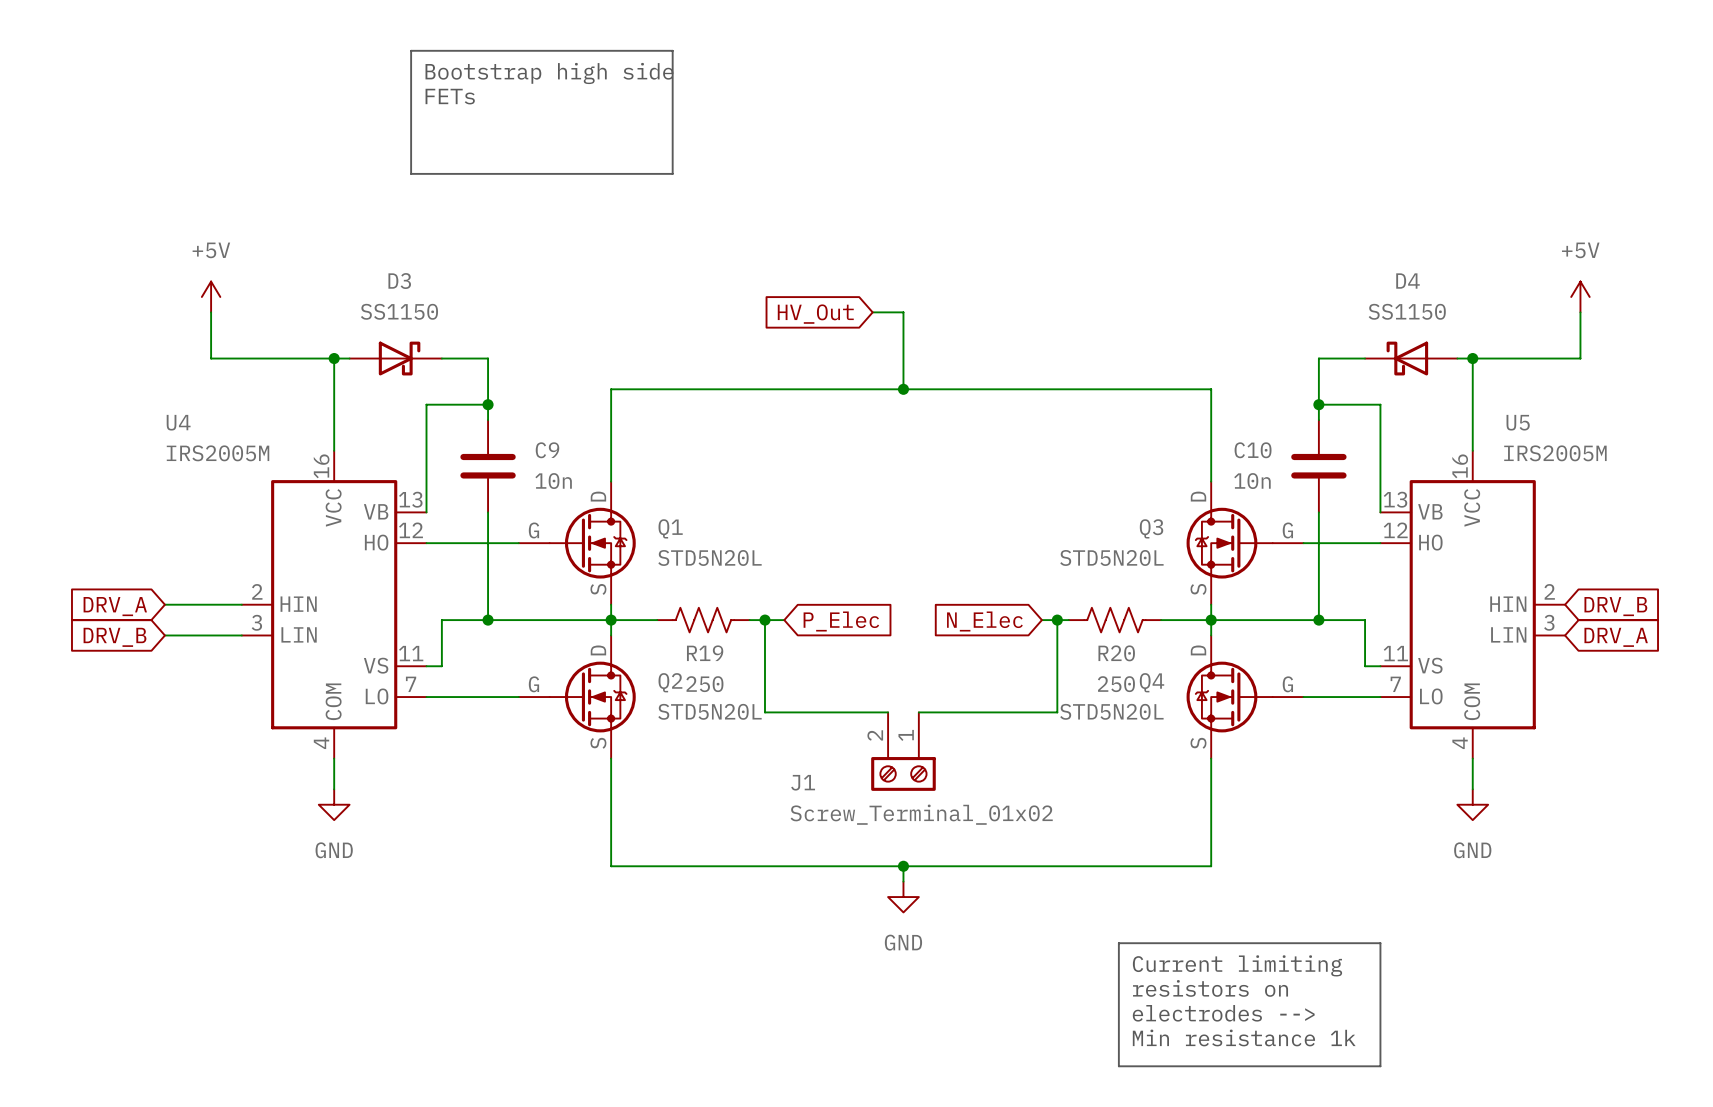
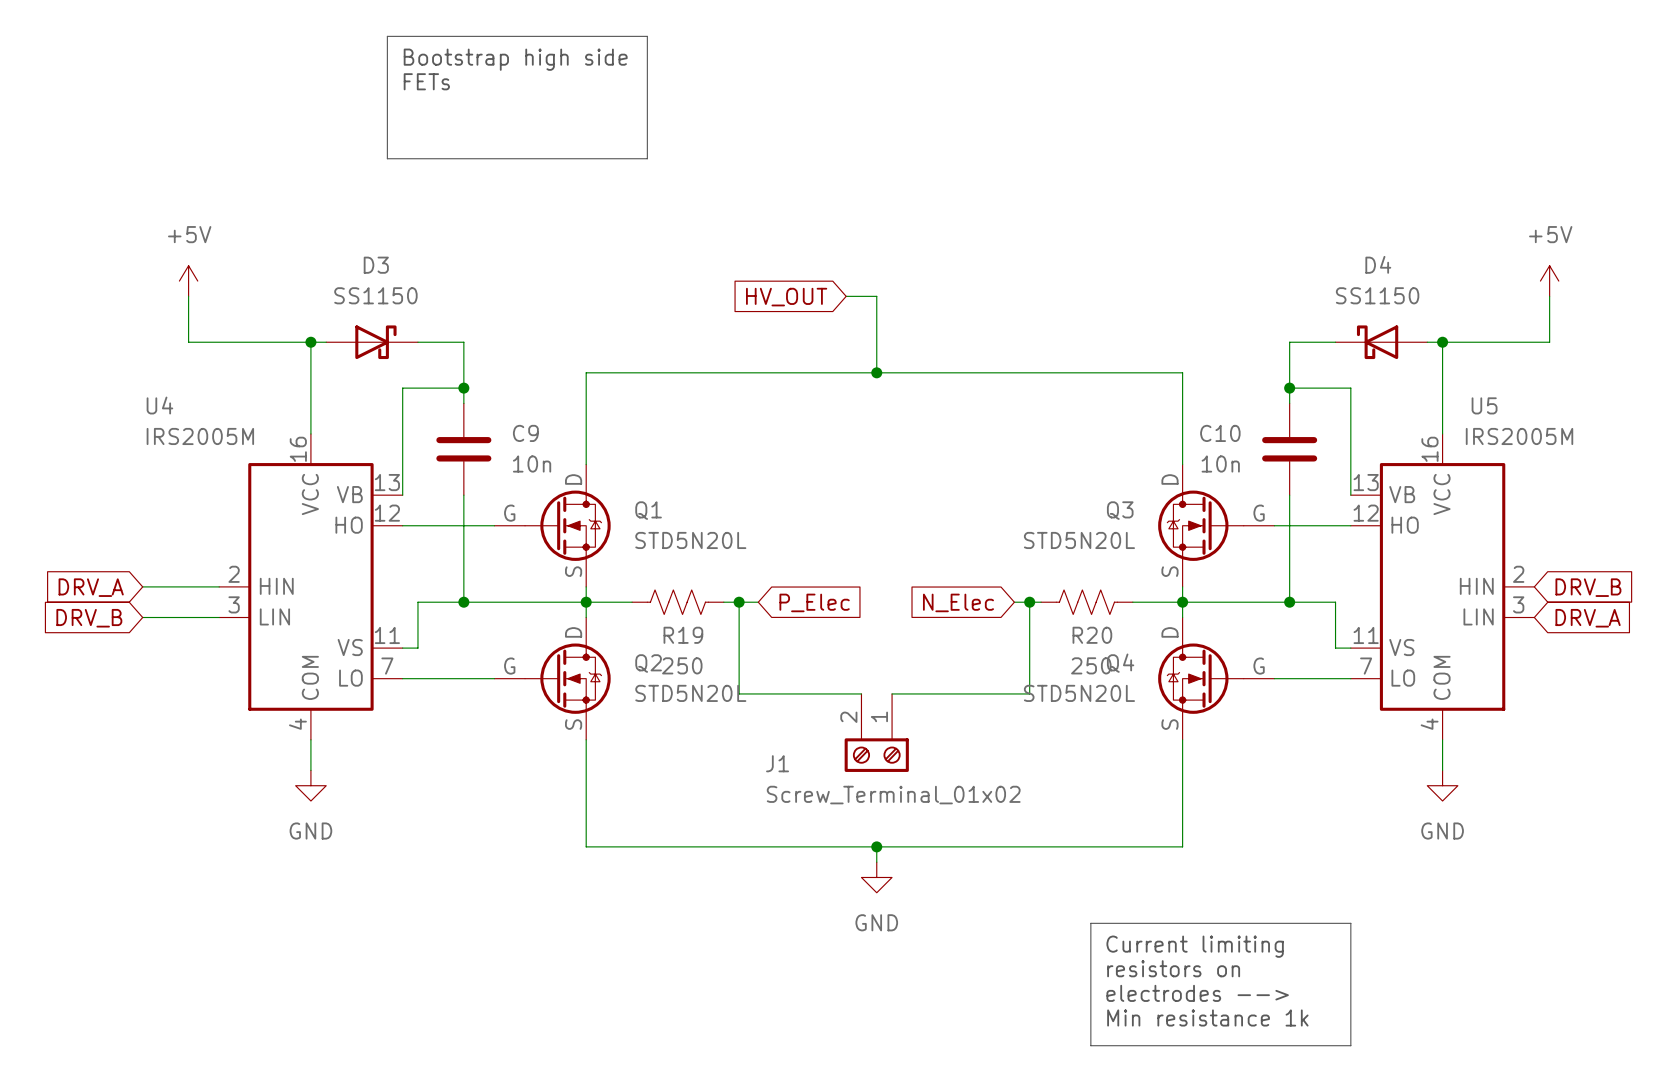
global label: HV_Out (815, 314) -> HV_OUT (786, 297)

